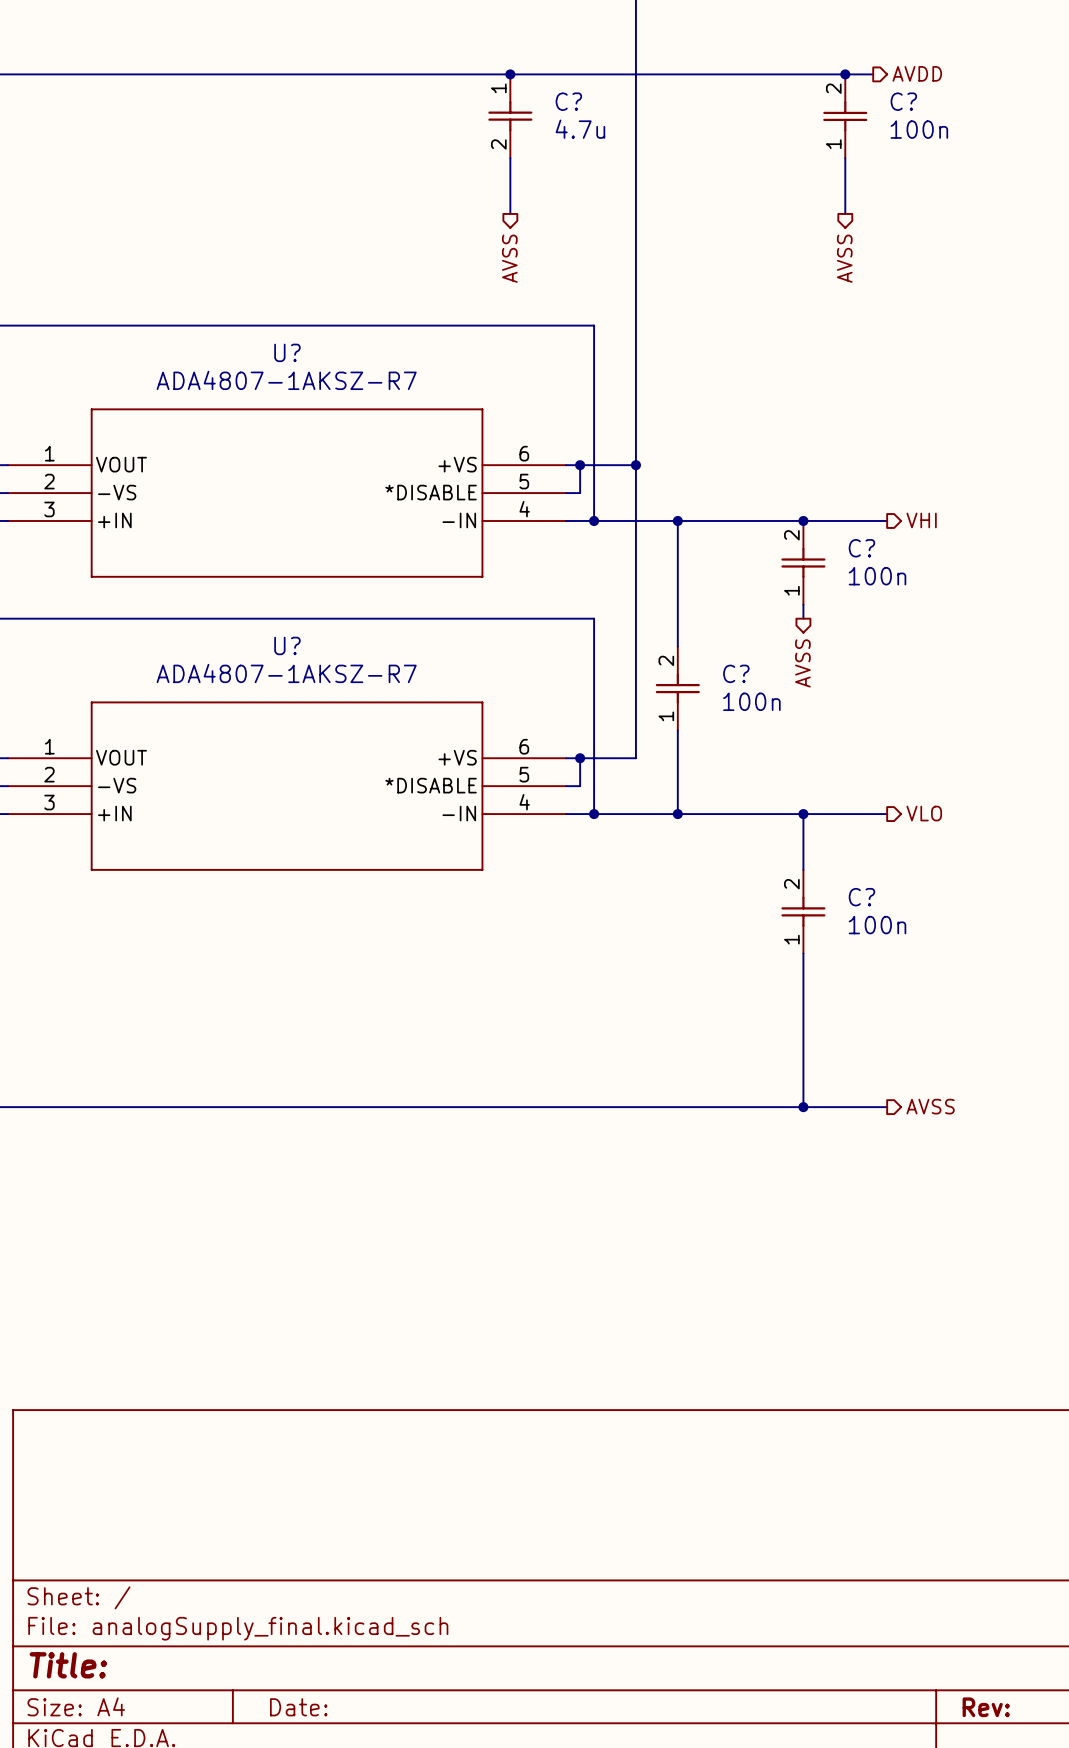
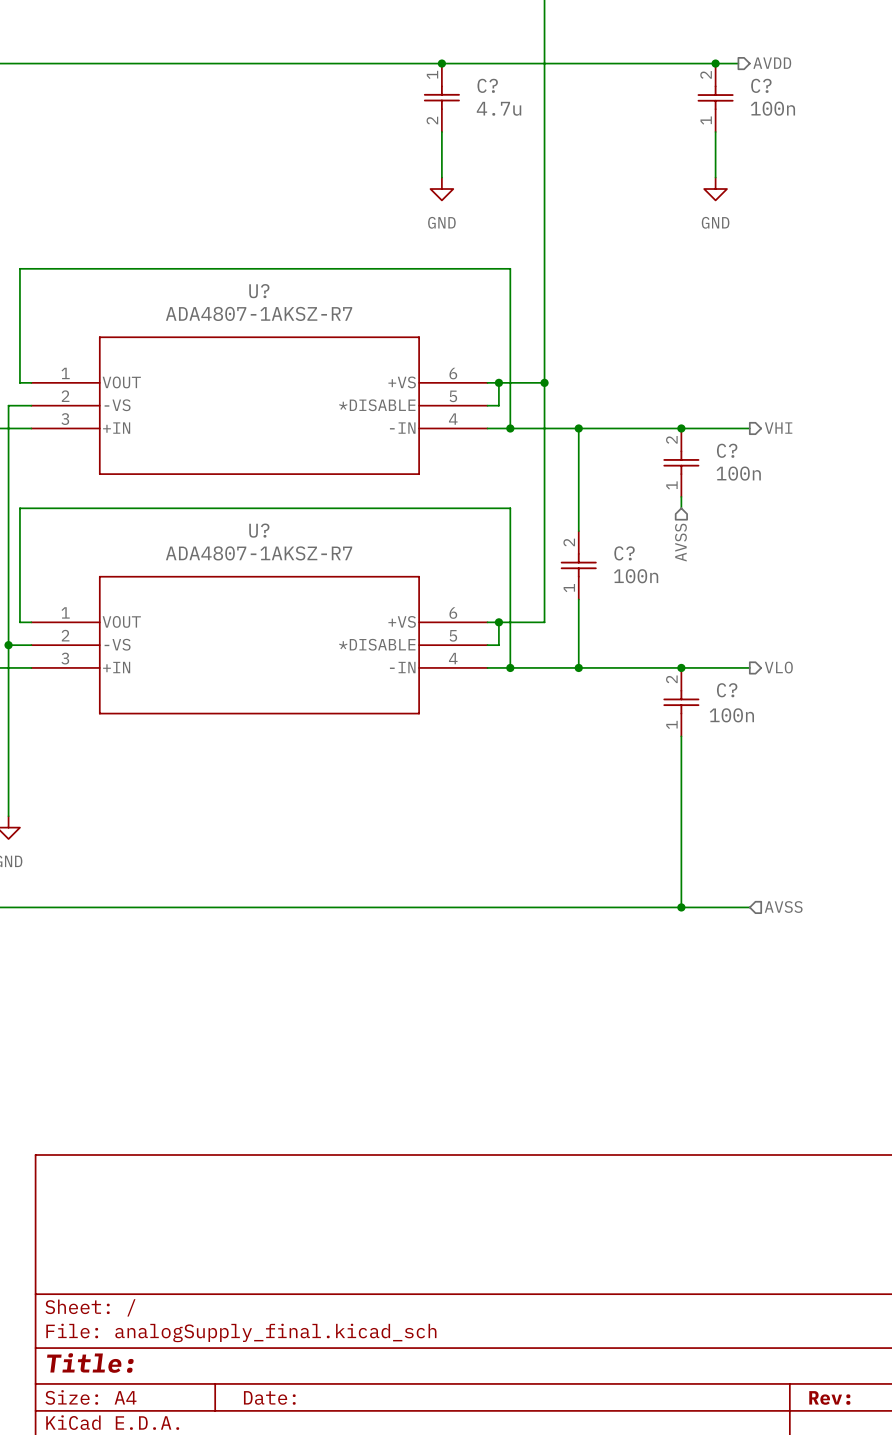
power symbol: none -> GND (441, 189)
power symbol: none -> GND (715, 189)
hierarchical label: AVSS (509, 258) -> none
hierarchical label: AVSS (844, 258) -> none
hierarchical label shape: output (802, 663) -> input (680, 542)
C? position: (803, 911) -> (681, 702)
C? value position: 100n (877, 925) -> 100n (731, 715)
hierarchical label shape: output (930, 1106) -> input (783, 907)

